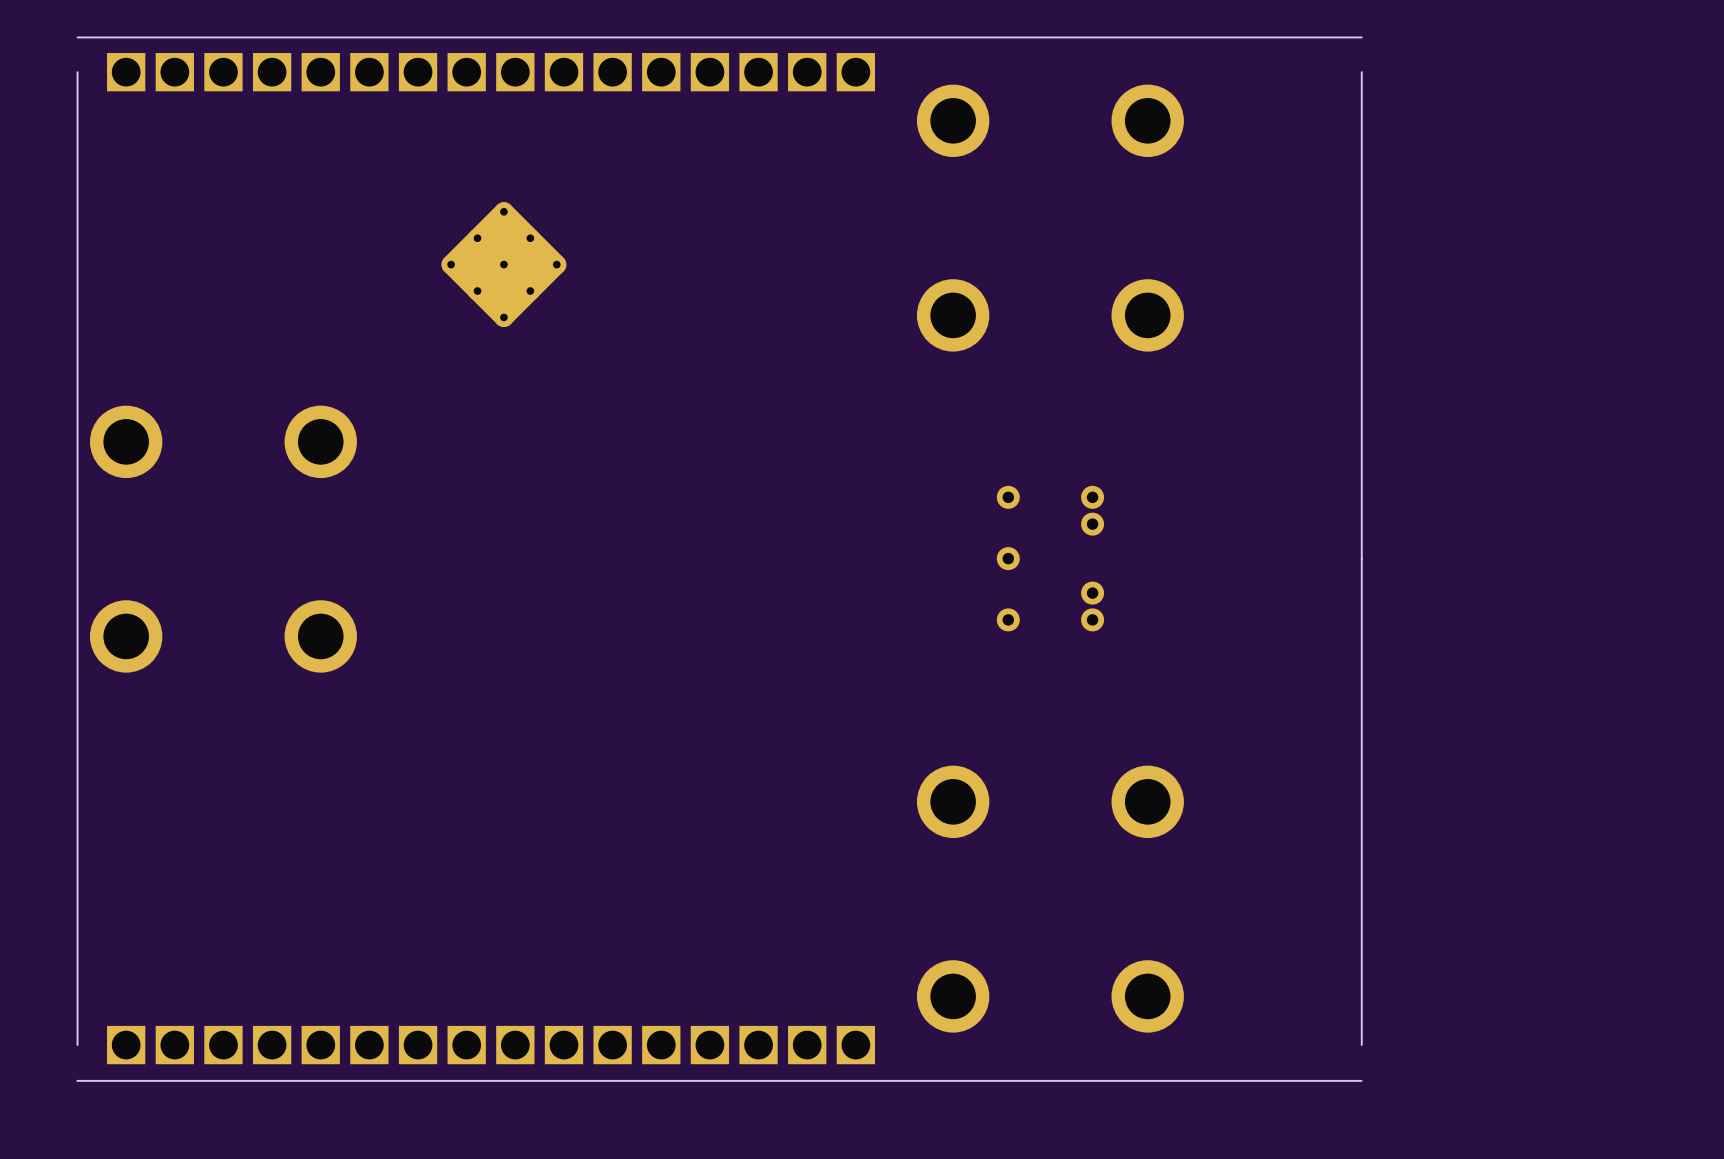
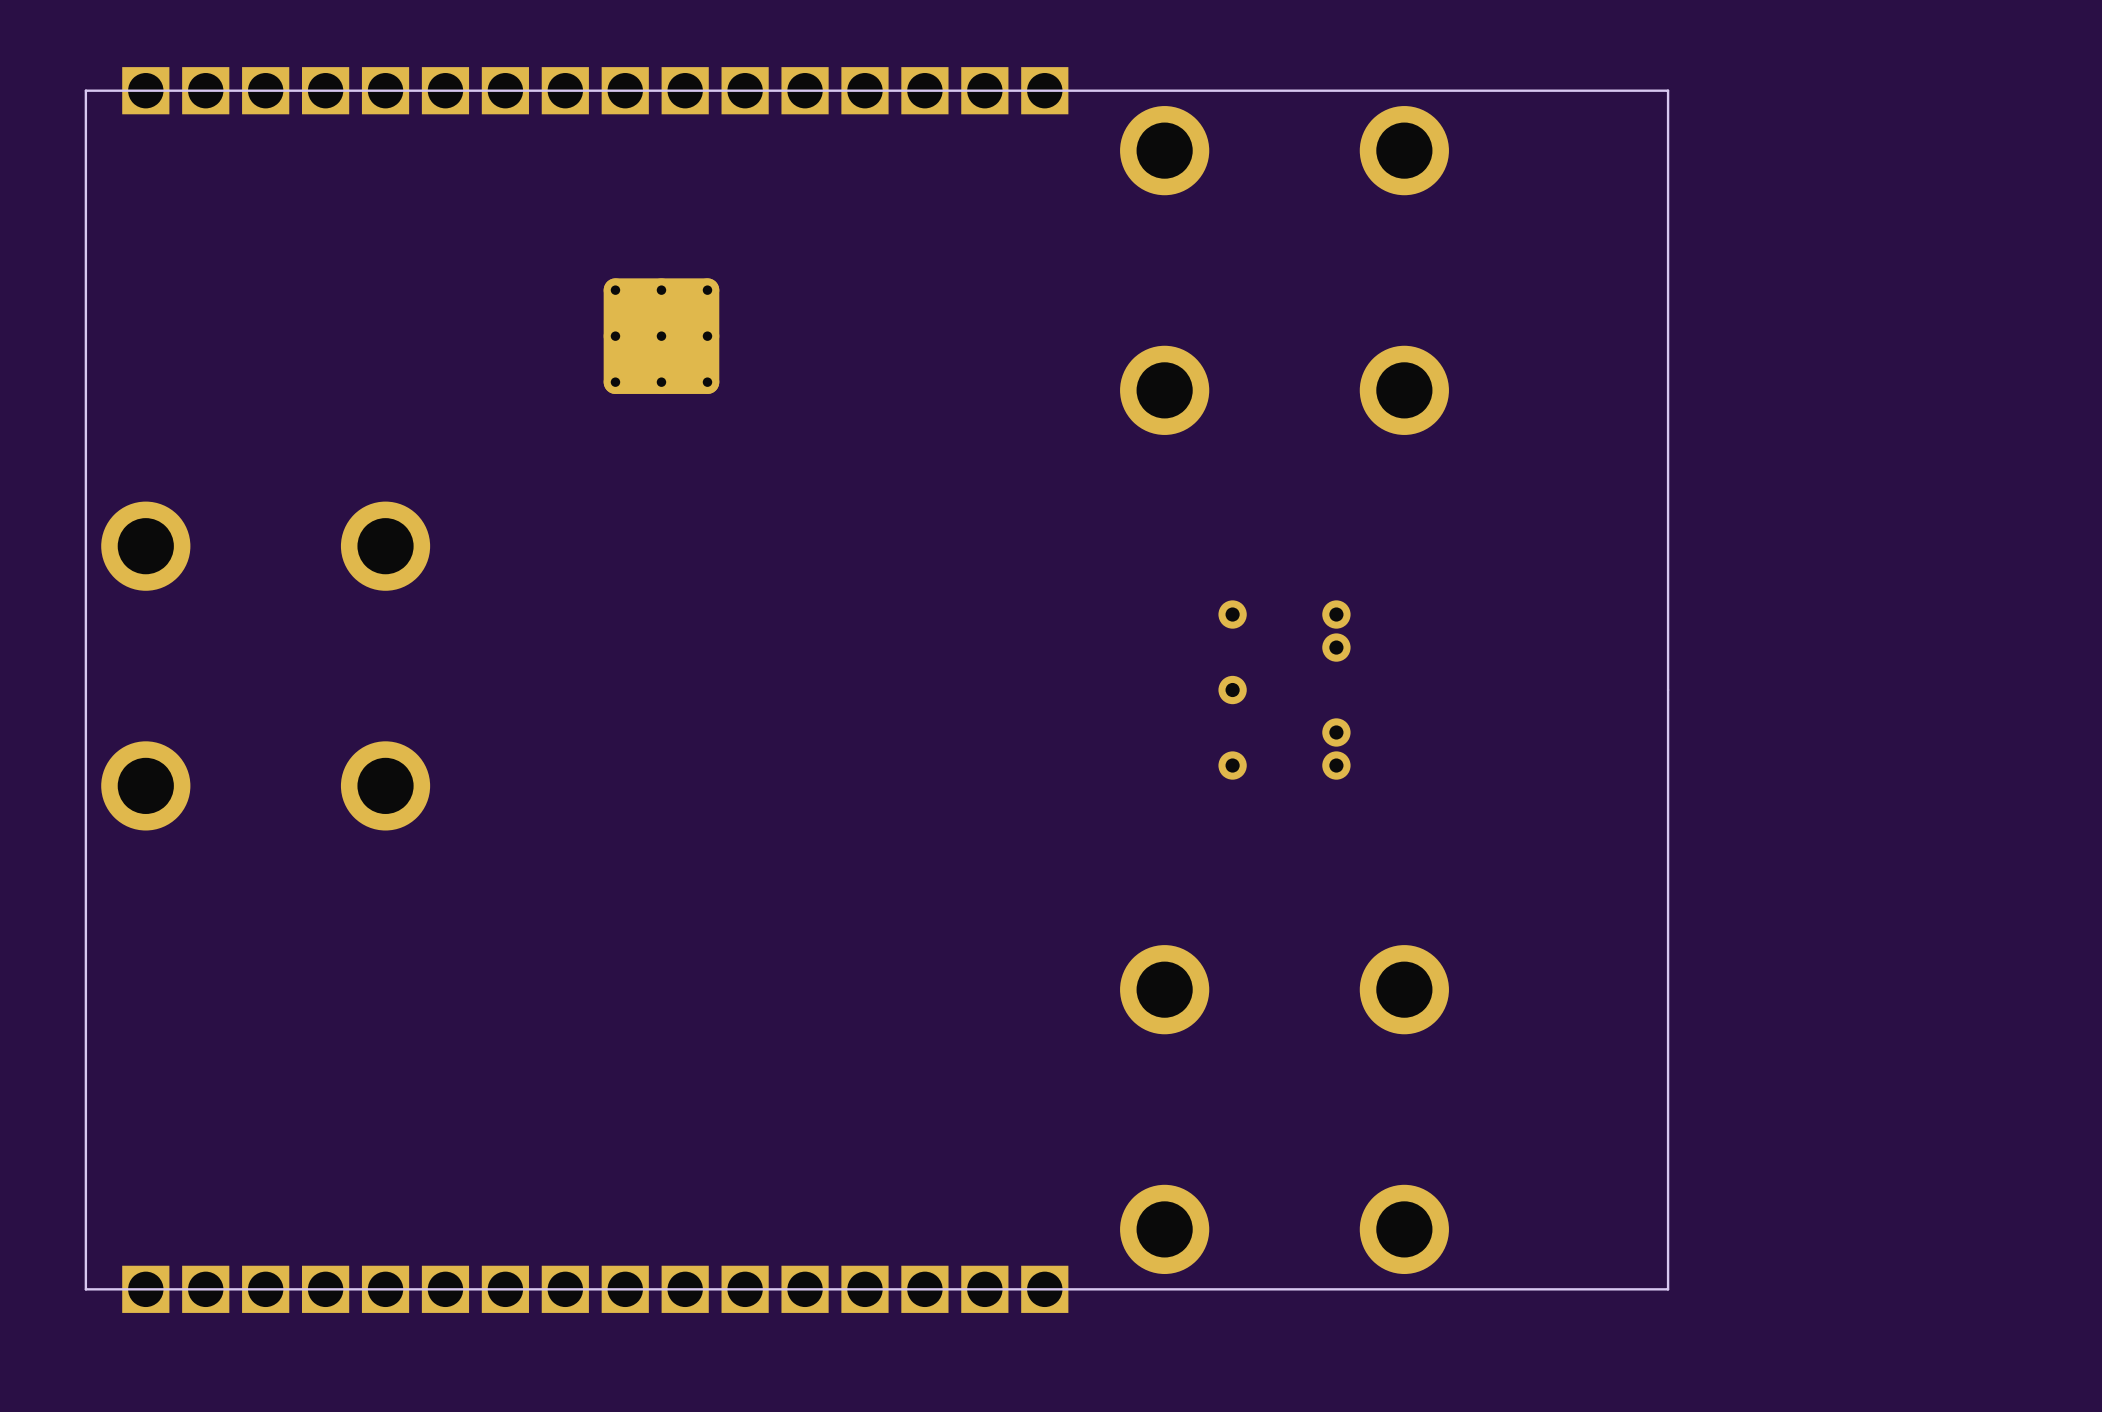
board edge: (1361, 37) (77, 37) -> (1668, 90) (85, 90)
part: (503, 264) -> none
part: none -> (661, 336)
board edge: (1361, 1080) (77, 1080) -> (1668, 1289) (85, 1289)

